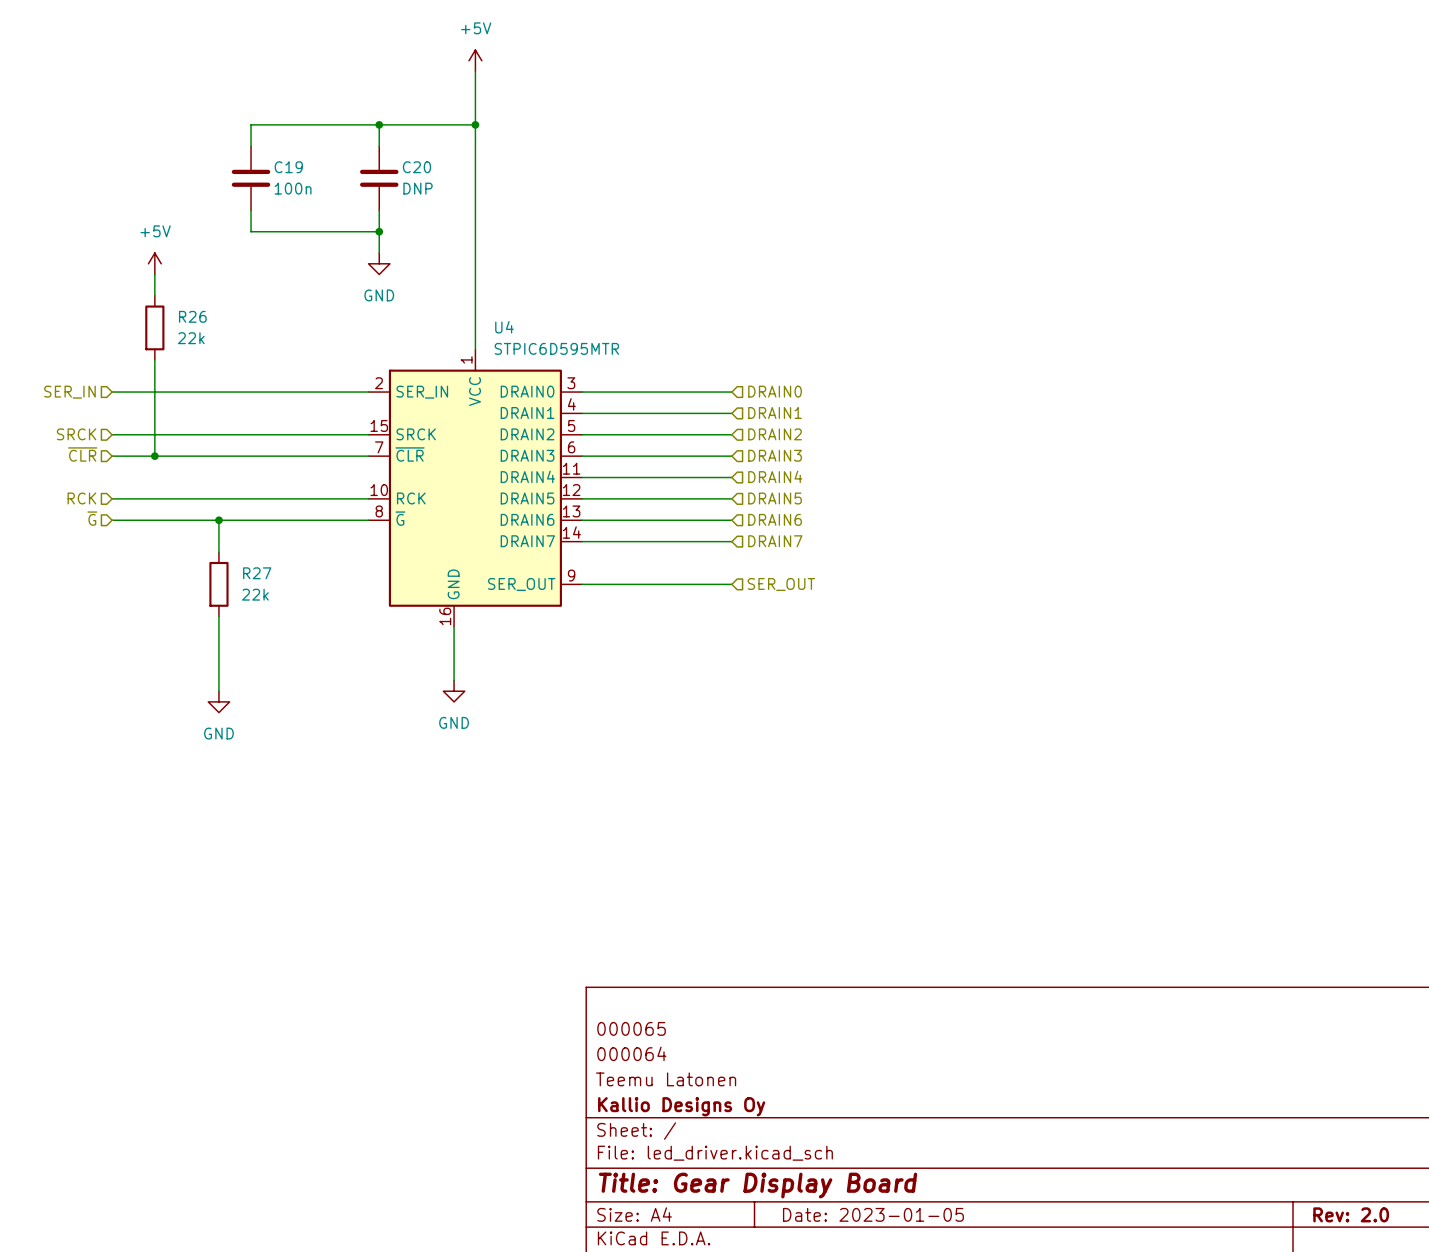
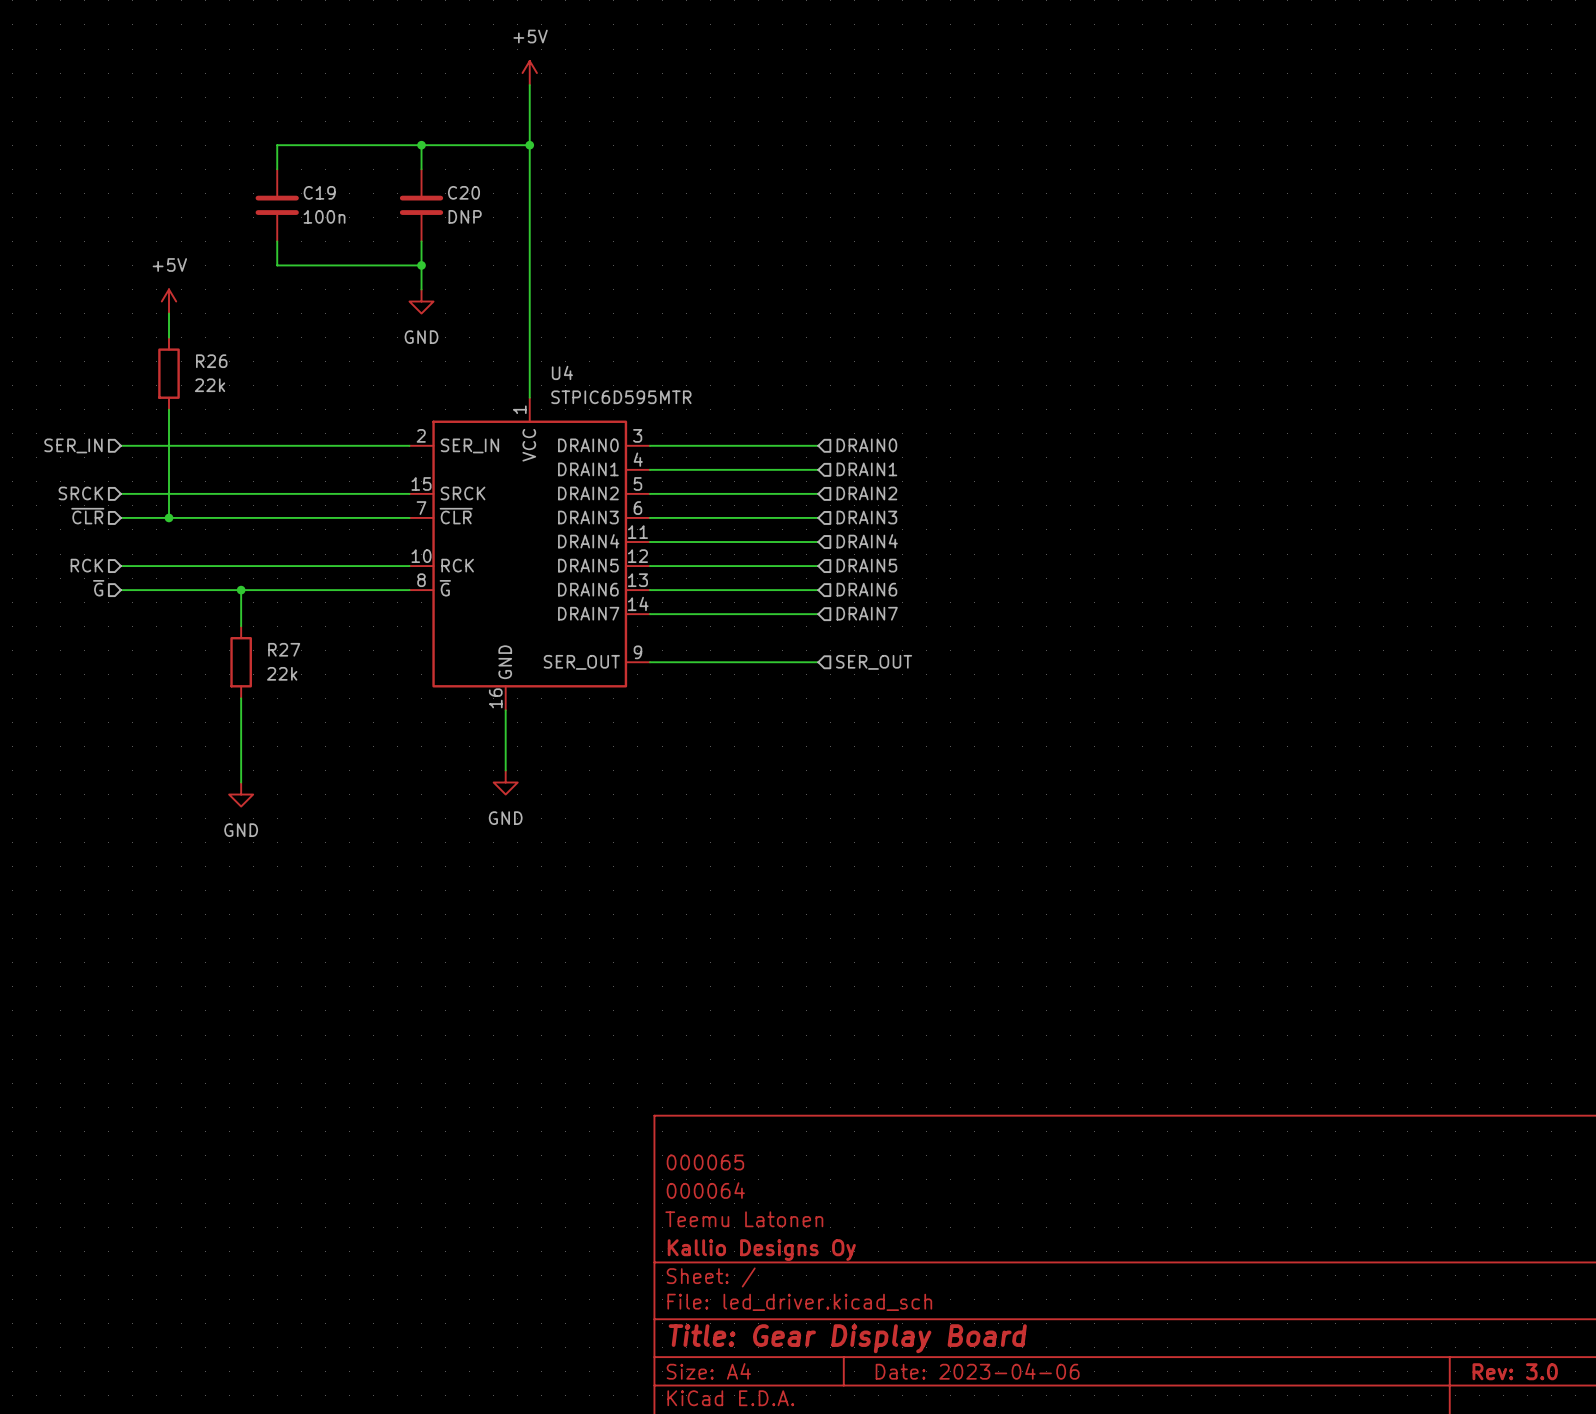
title block: Date: 2023-01-05 (873, 1214) -> Date: 2023-04-06 (977, 1371)
title block: Rev: 2.0 (1351, 1214) -> Rev: 3.0 (1515, 1371)

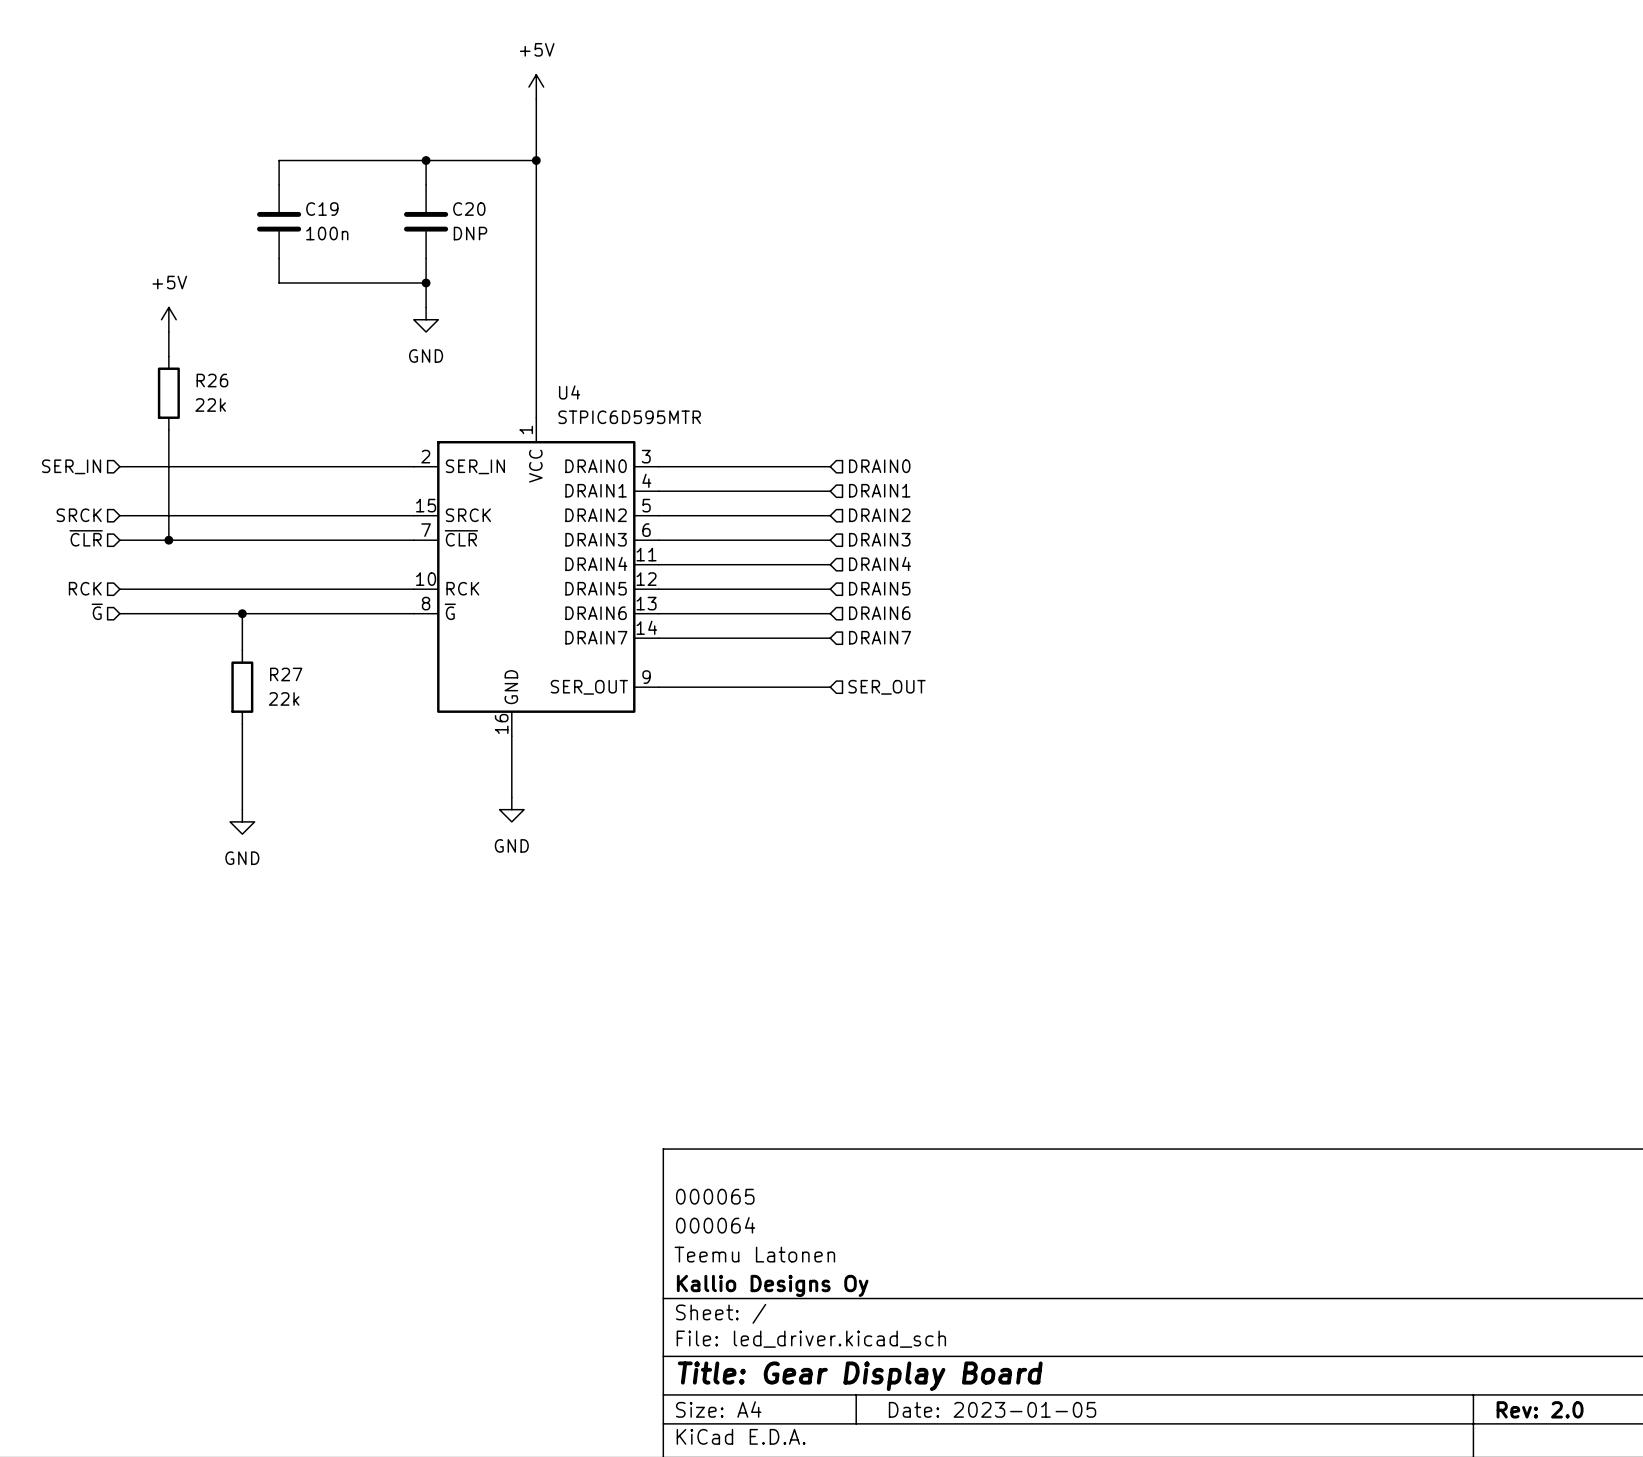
title block: Date: 2023-04-06 (977, 1371) -> Date: 2023-01-05 (992, 1409)
title block: Rev: 3.0 (1515, 1371) -> Rev: 2.0 (1540, 1409)

